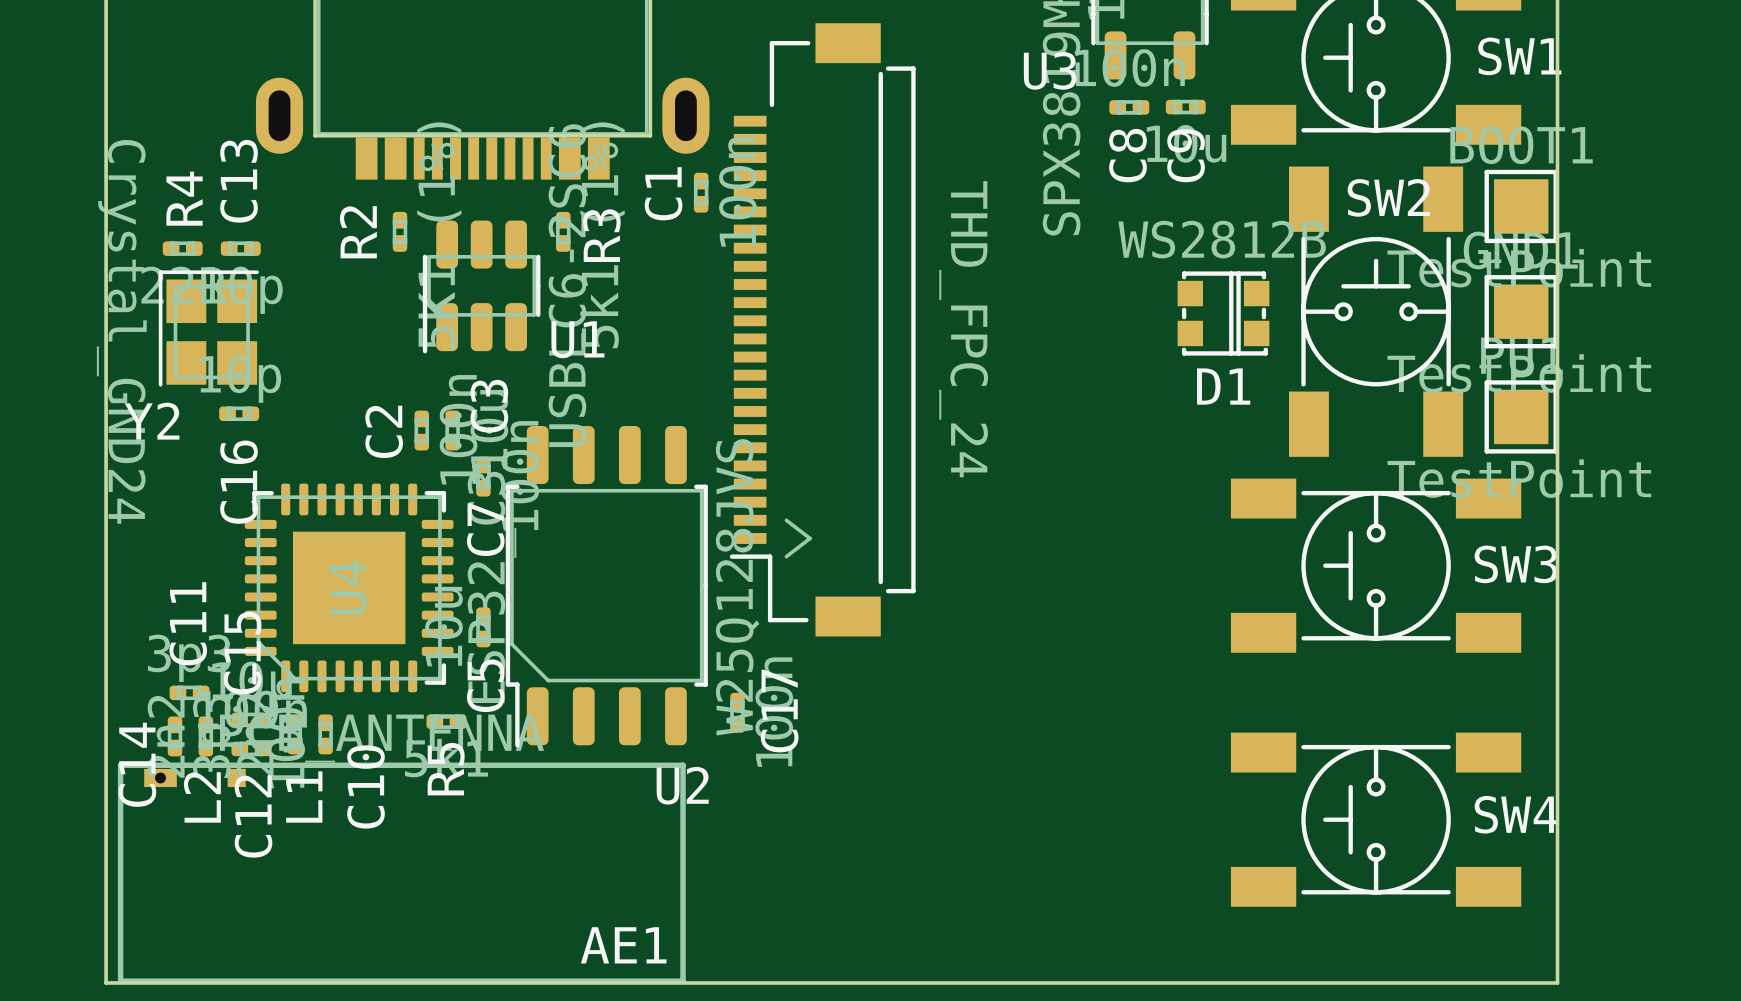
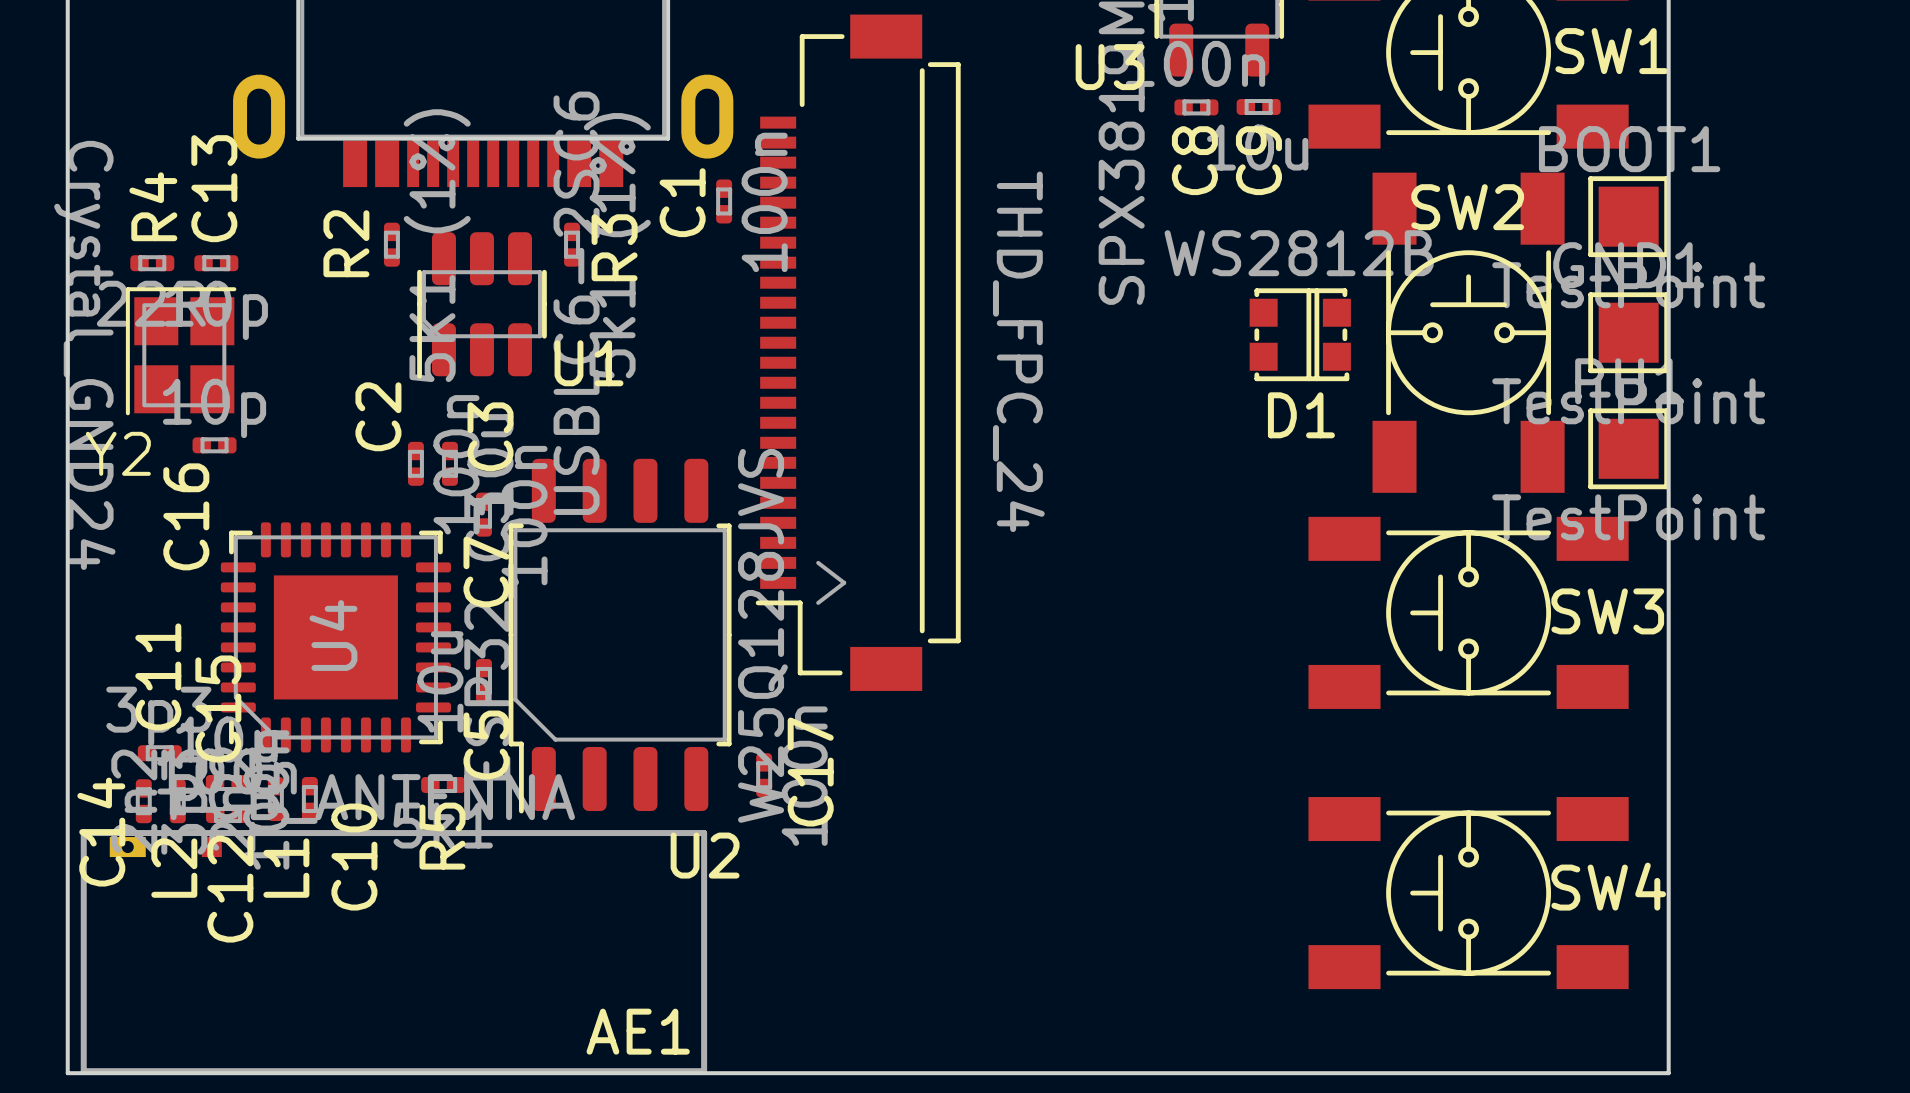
C2 name position: C2 (384, 431) -> C2 (378, 416)
C16 name position: C16 (239, 482) -> C16 (186, 516)

